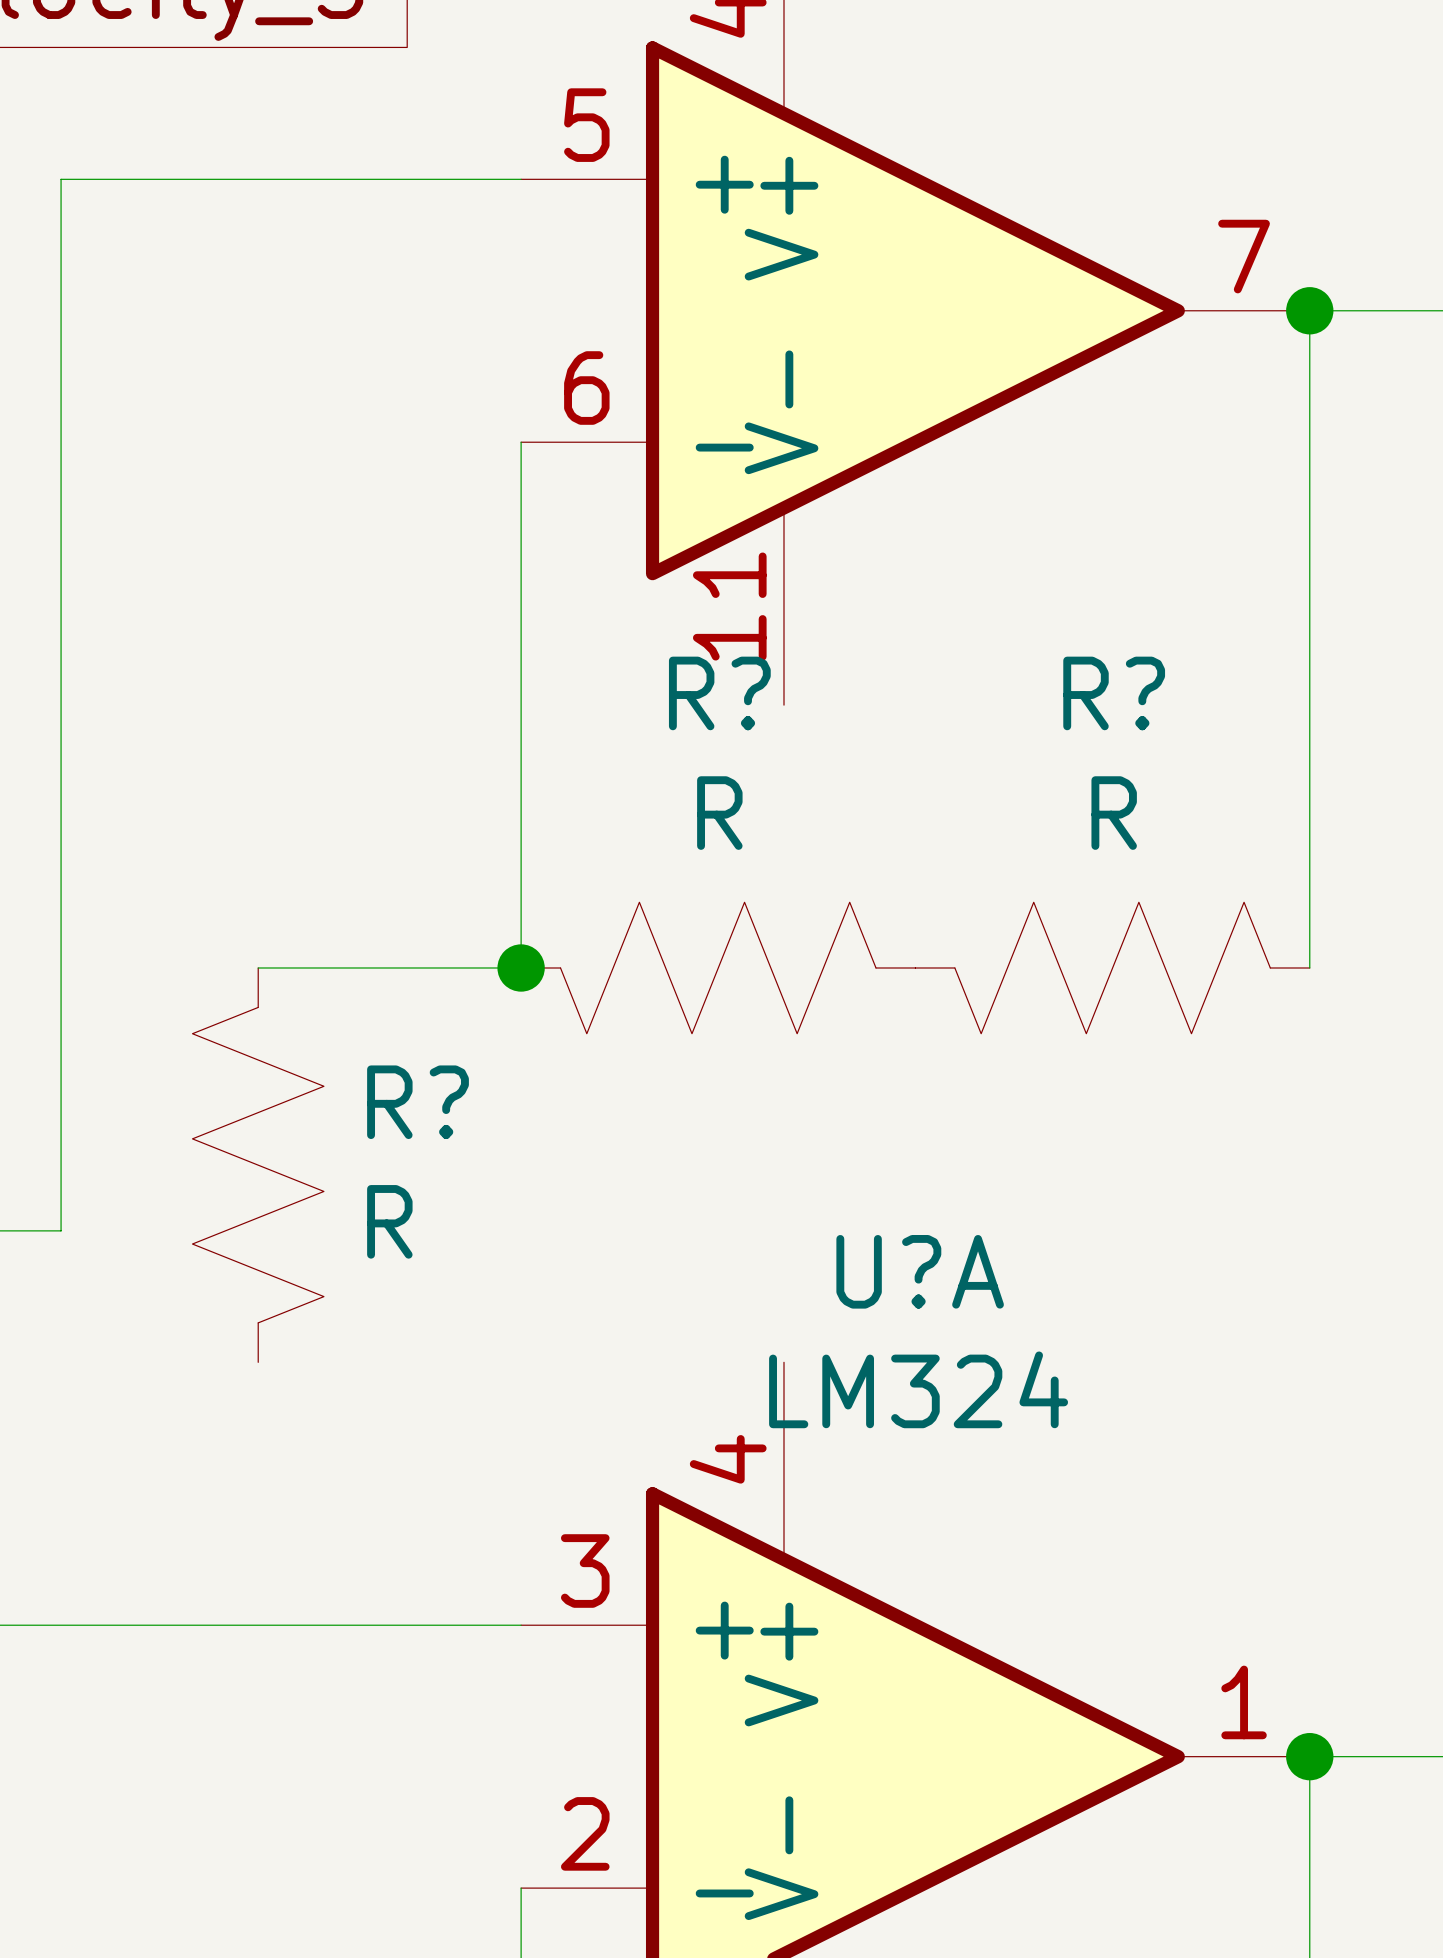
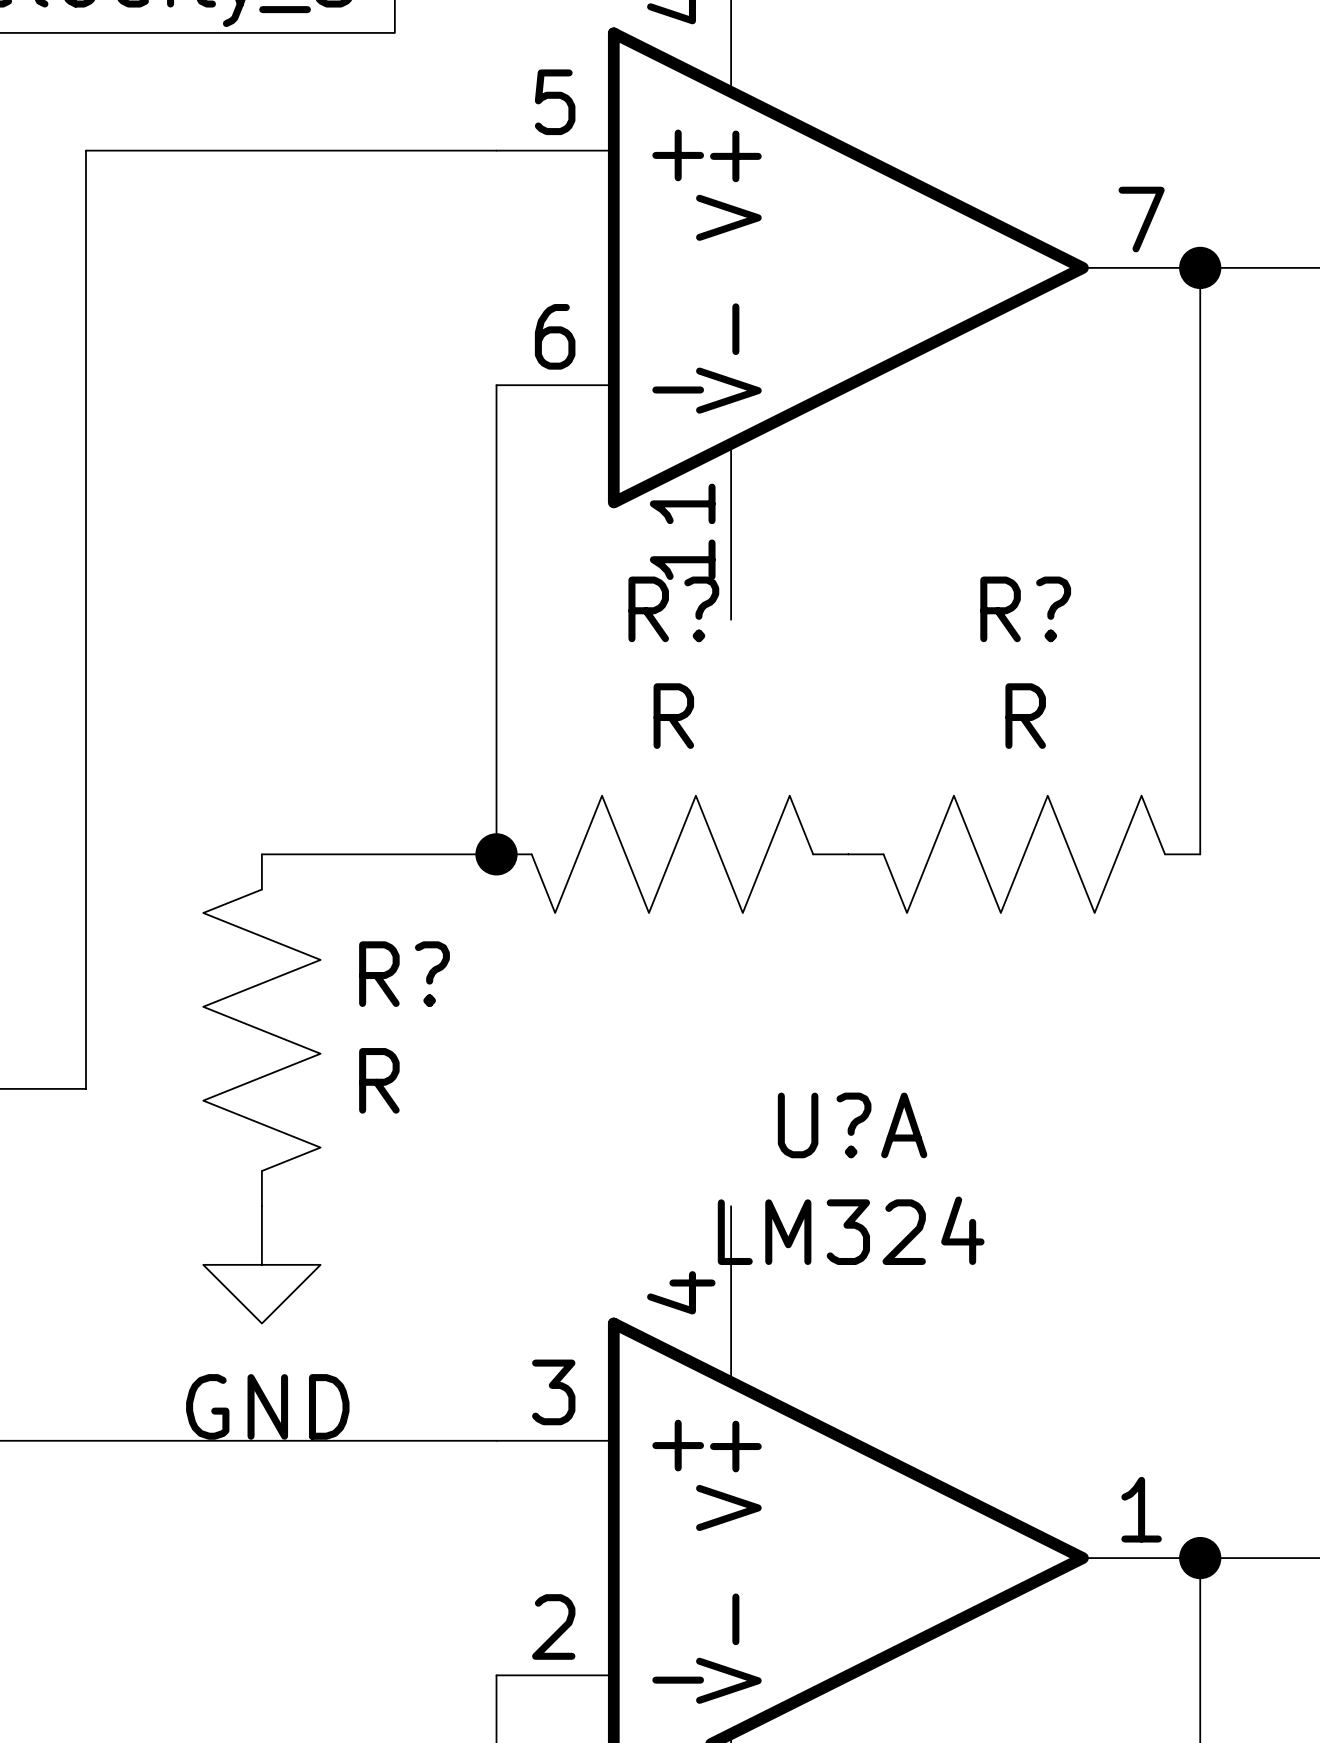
power symbol: none -> GND (261, 1264)

